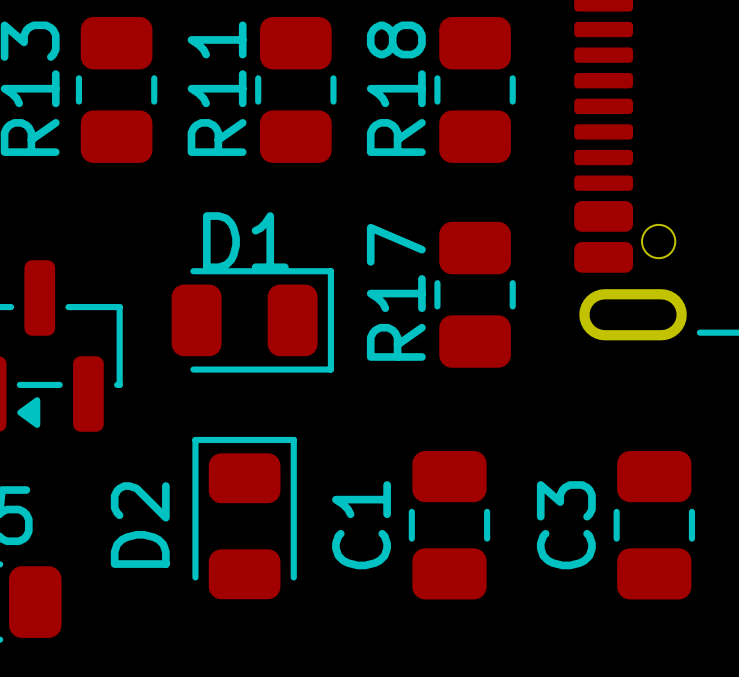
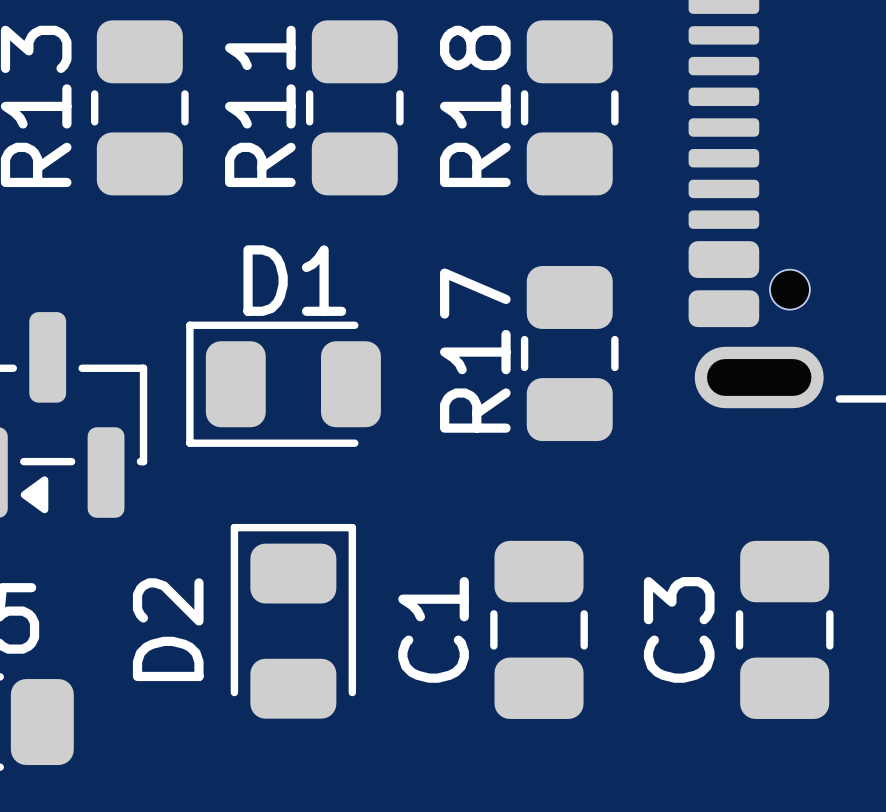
D1 rotation: 0° (252, 320) -> 180° (283, 384)

